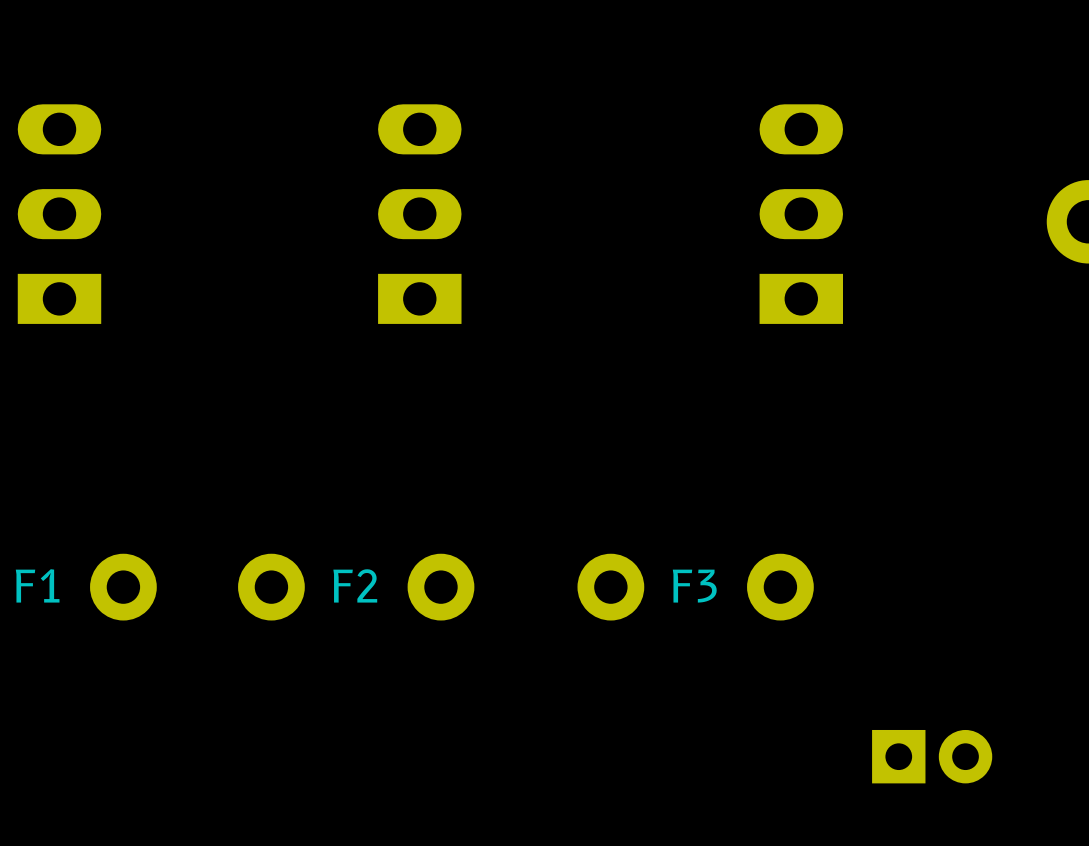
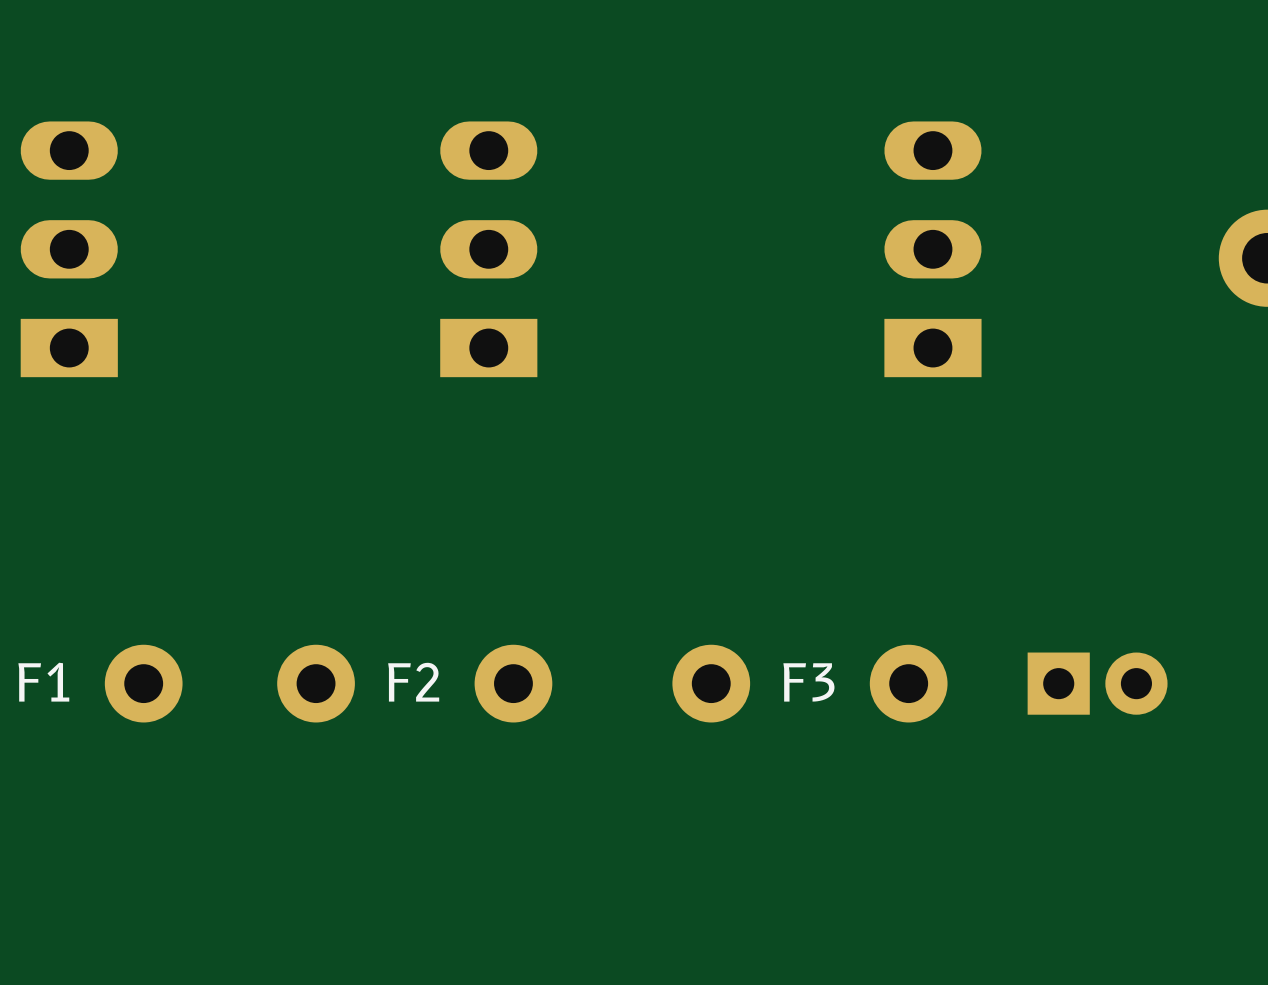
part position: (932, 756) -> (1097, 683)

